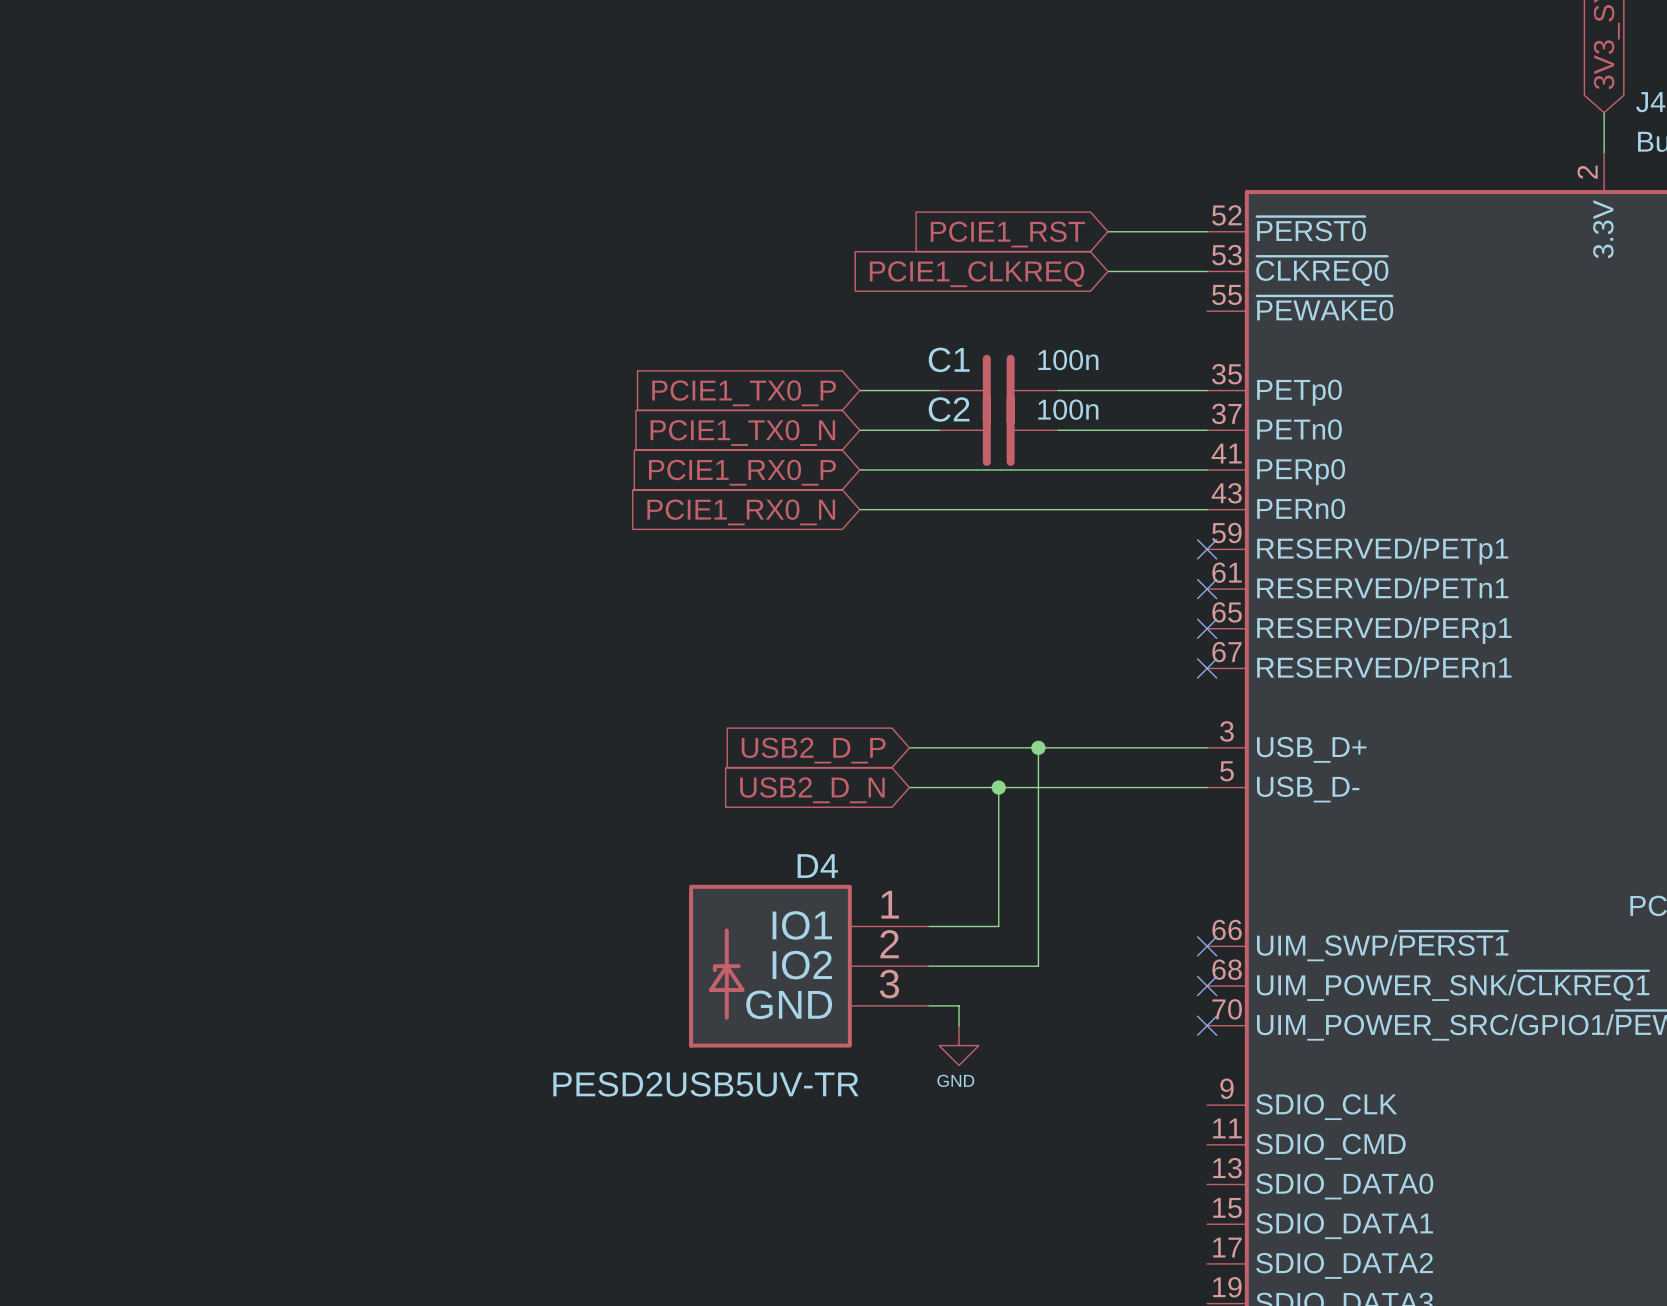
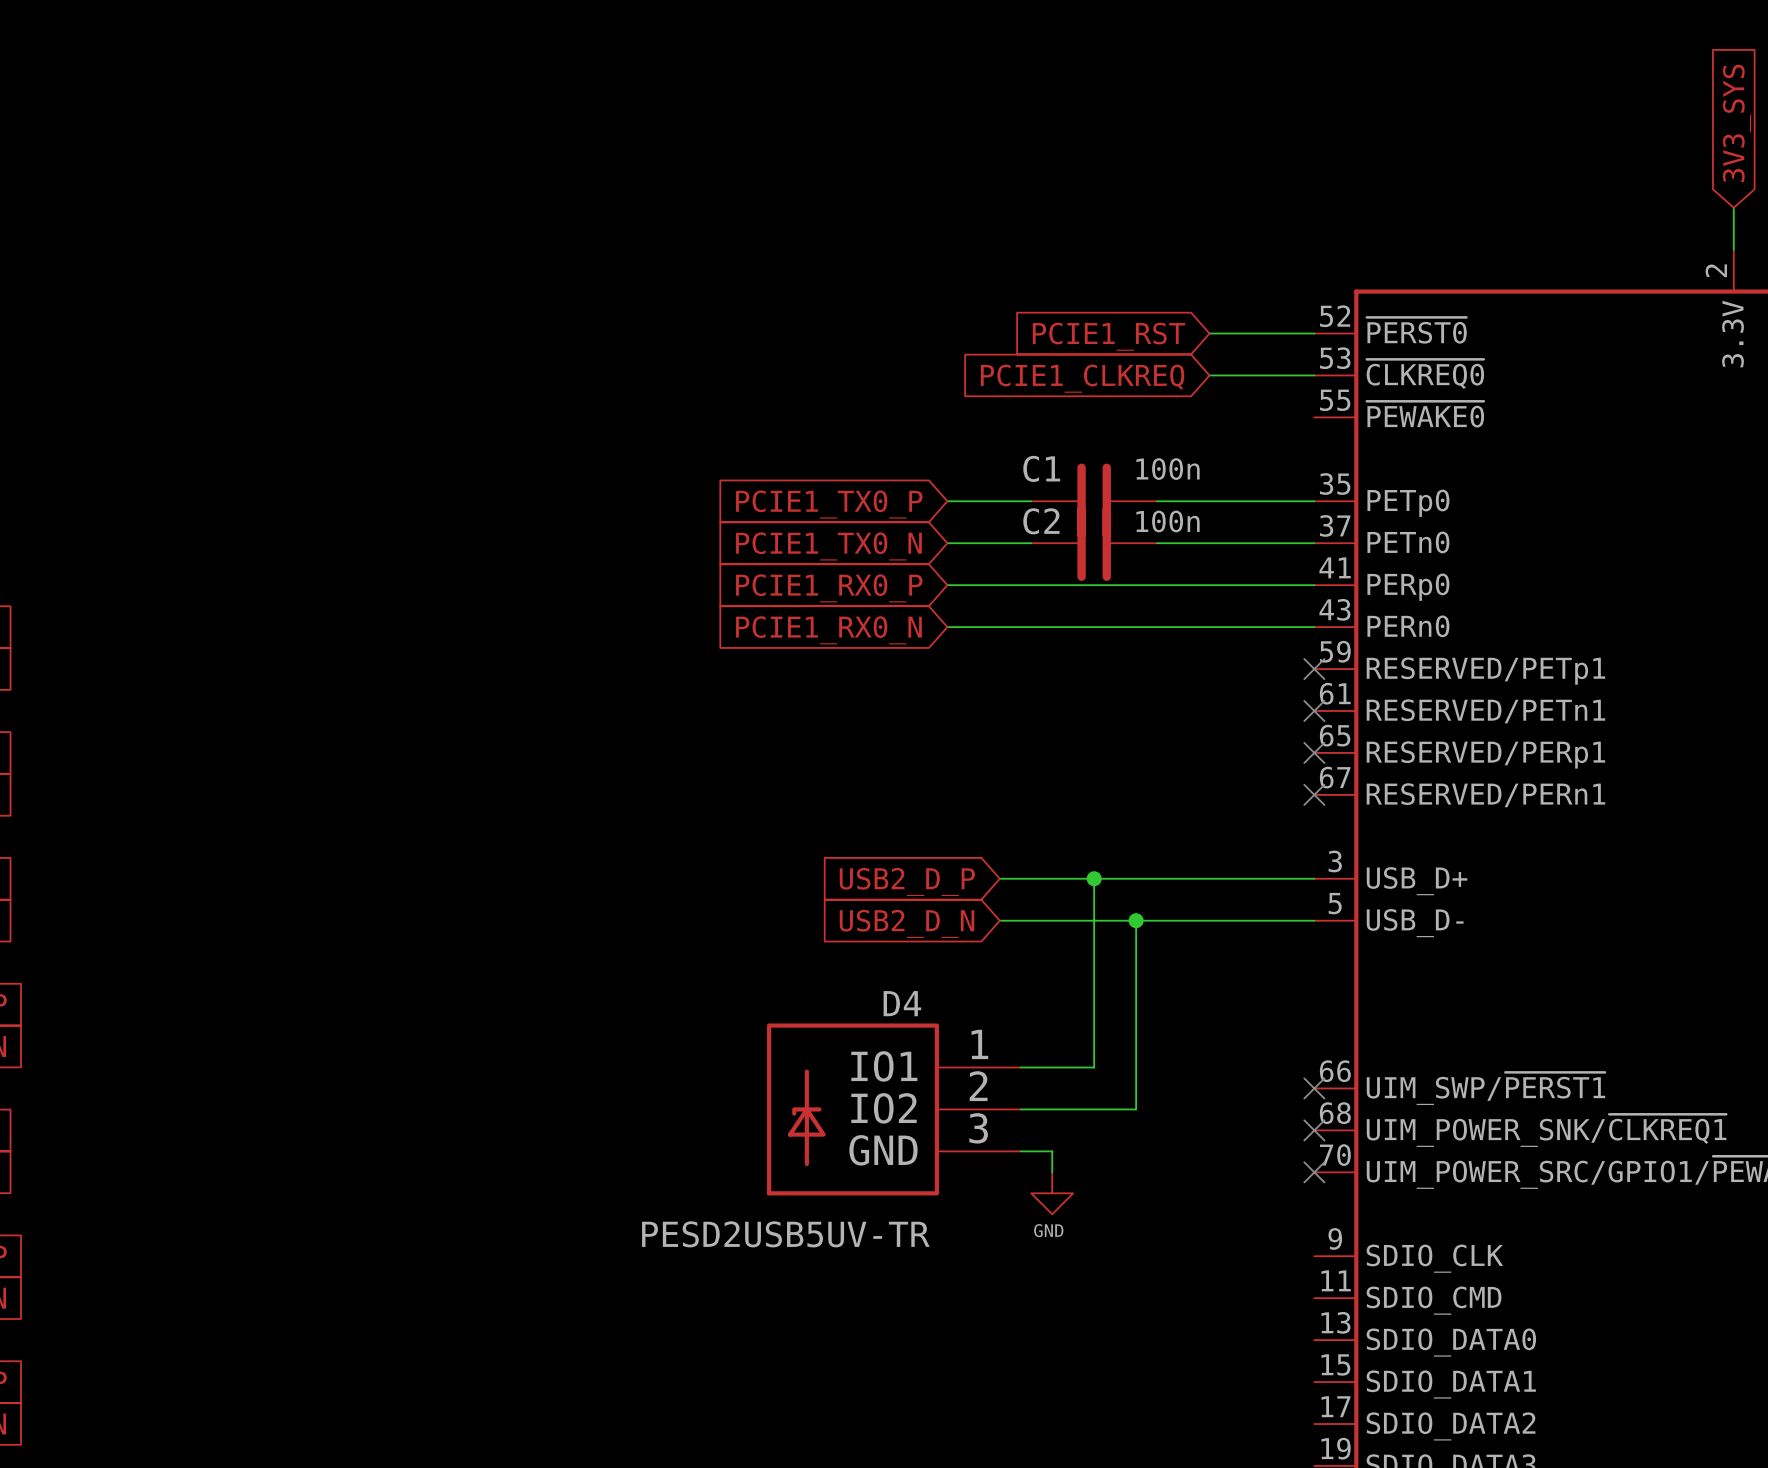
junction: none -> (1094, 878)
wire: (1038, 747) (1038, 787) -> (1094, 878) (1094, 920)
junction: (1038, 747) -> none
junction: (998, 787) -> none
junction: none -> (1136, 920)

